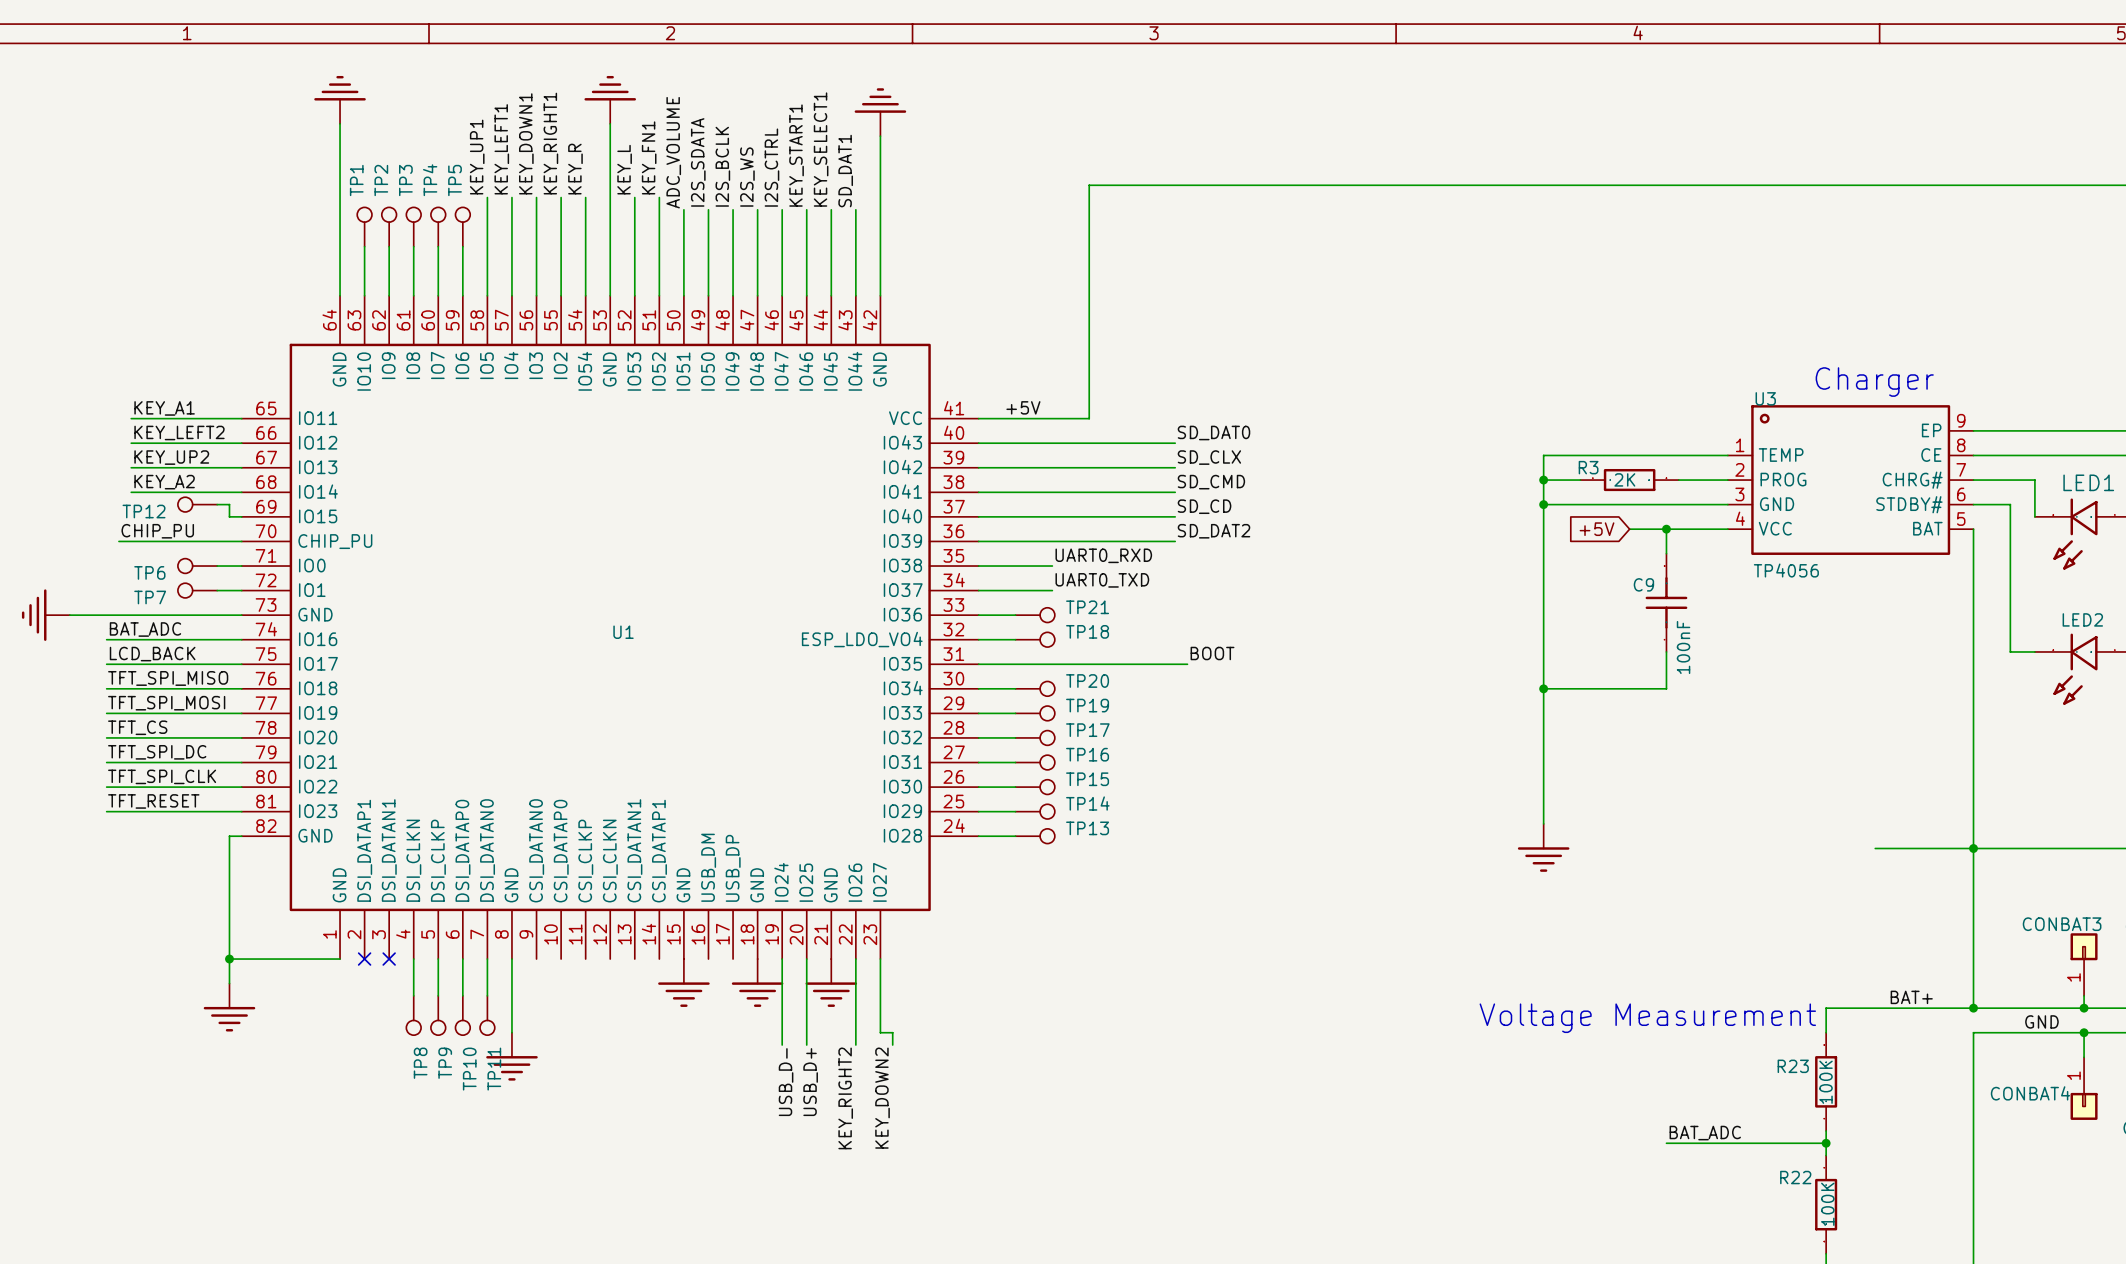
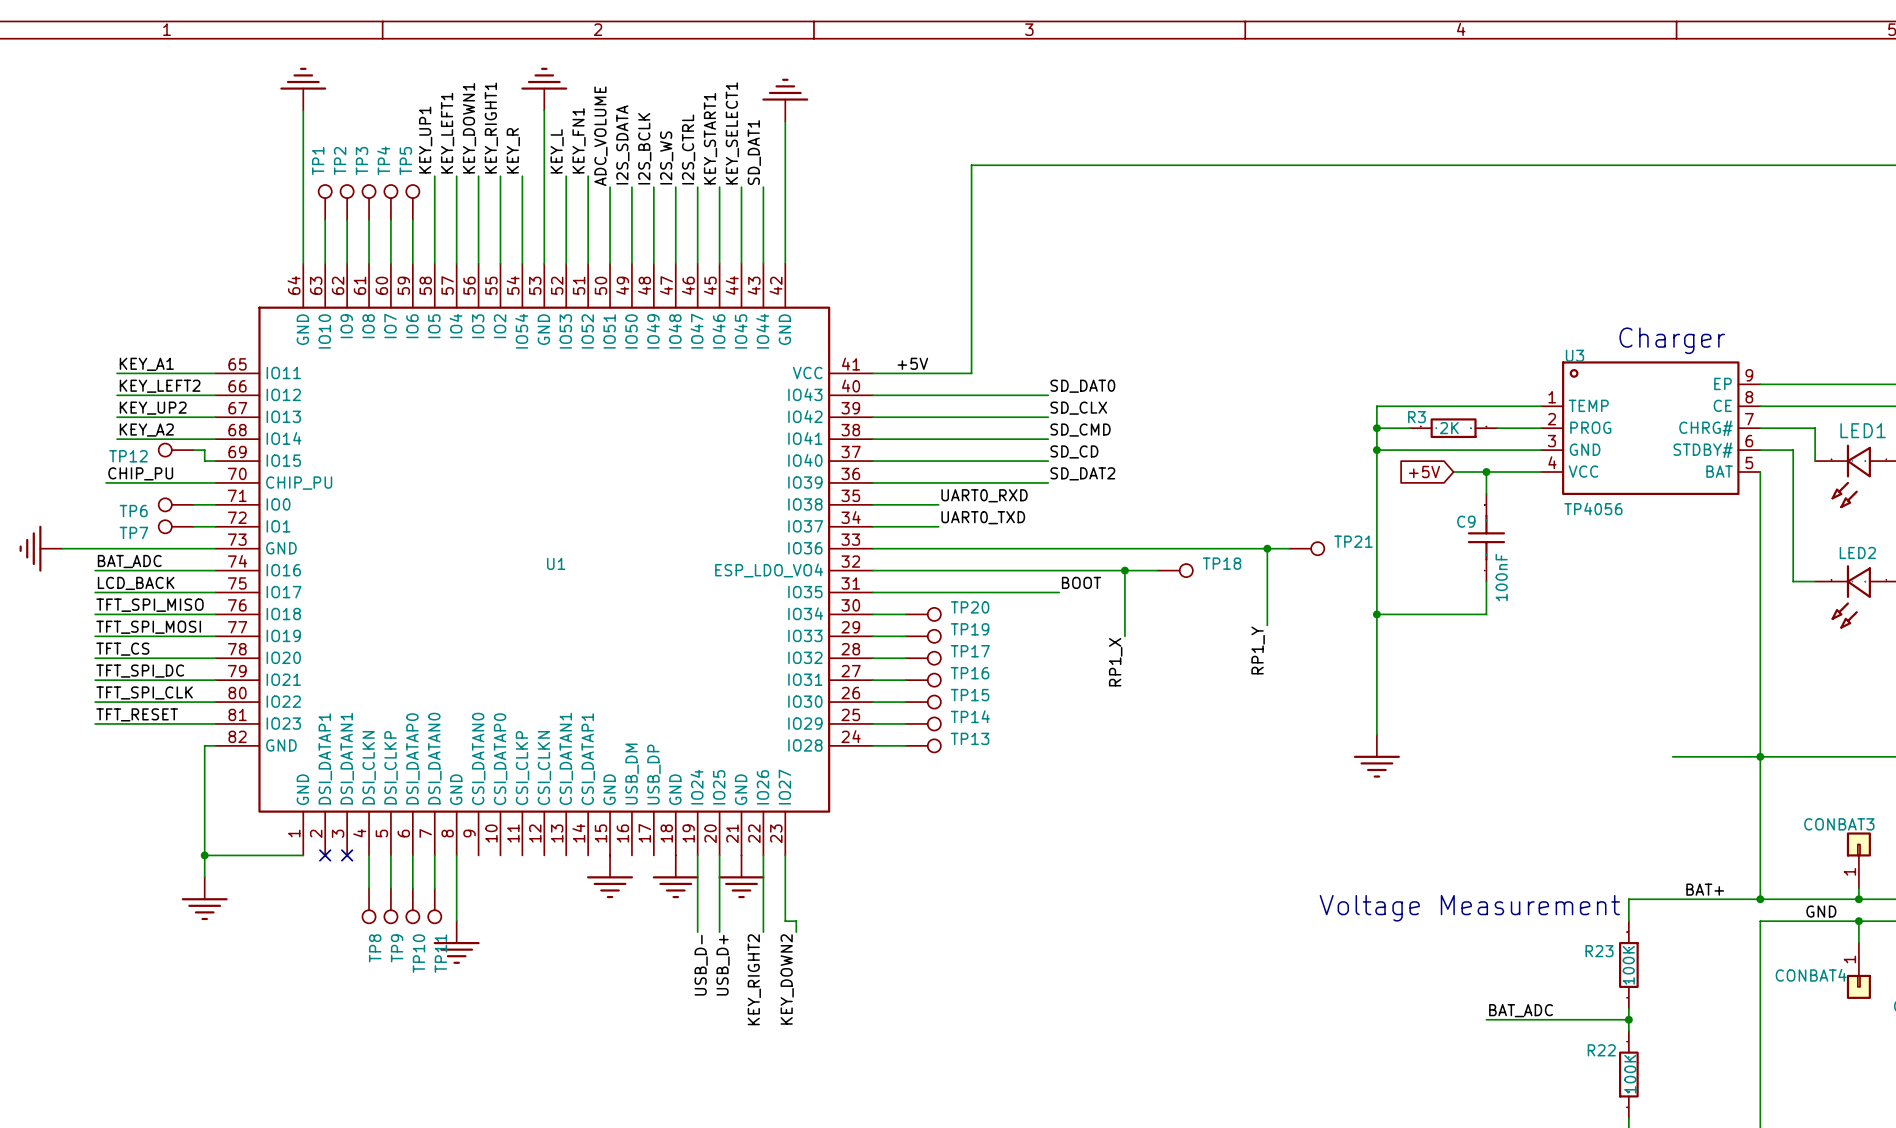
wire: none -> (905, 548) (1289, 548)
TP21 position: (1035, 615) -> (1306, 548)
wire: none -> (1267, 548) (1267, 625)
junction: none -> (1267, 548)
wire: none -> (905, 570) (1157, 570)
TP18 position: (1035, 639) -> (1175, 570)
wire: none -> (1124, 570) (1124, 636)
junction: none -> (1124, 570)
label: none -> RP1_Y (1258, 650)
label: none -> RP1_X (1115, 662)

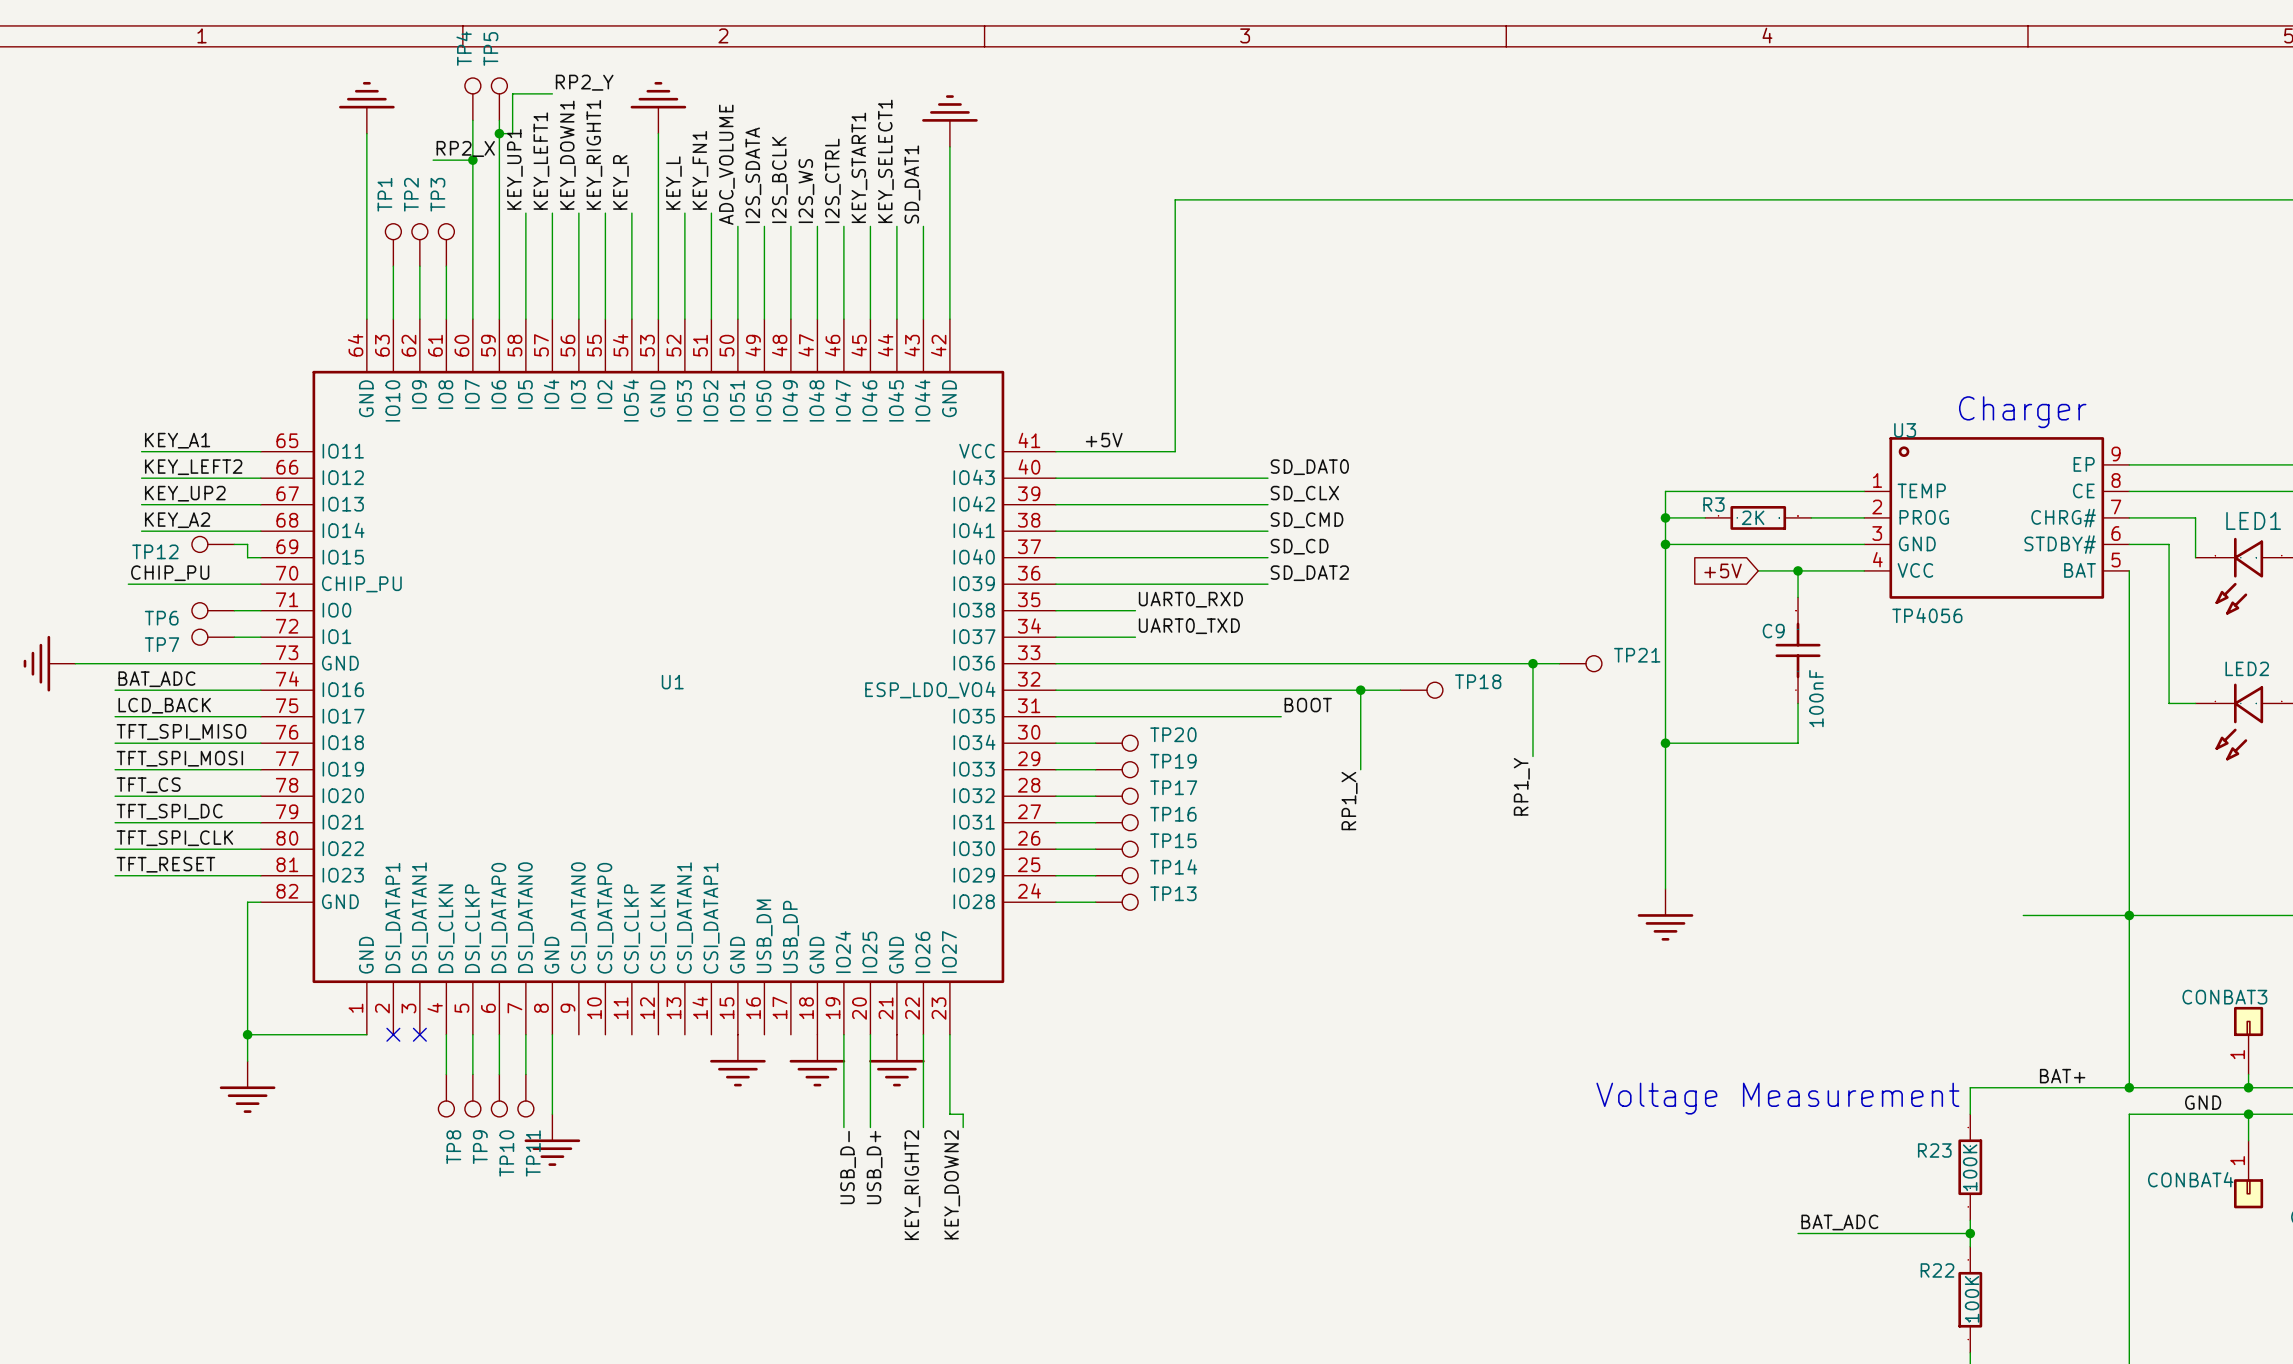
label: none -> RP2_Y (584, 82)
wire: none -> (552, 93) (512, 93) (512, 133) (499, 133)
wire: none -> (472, 120) (472, 266)
wire: none -> (499, 120) (499, 266)
junction: none -> (499, 133)
label: none -> RP2_X (465, 148)
wire: none -> (433, 160) (472, 160)
junction: none -> (472, 160)
TP4 position: (390, 202) -> (472, 99)
TP5 position: (412, 202) -> (499, 99)

